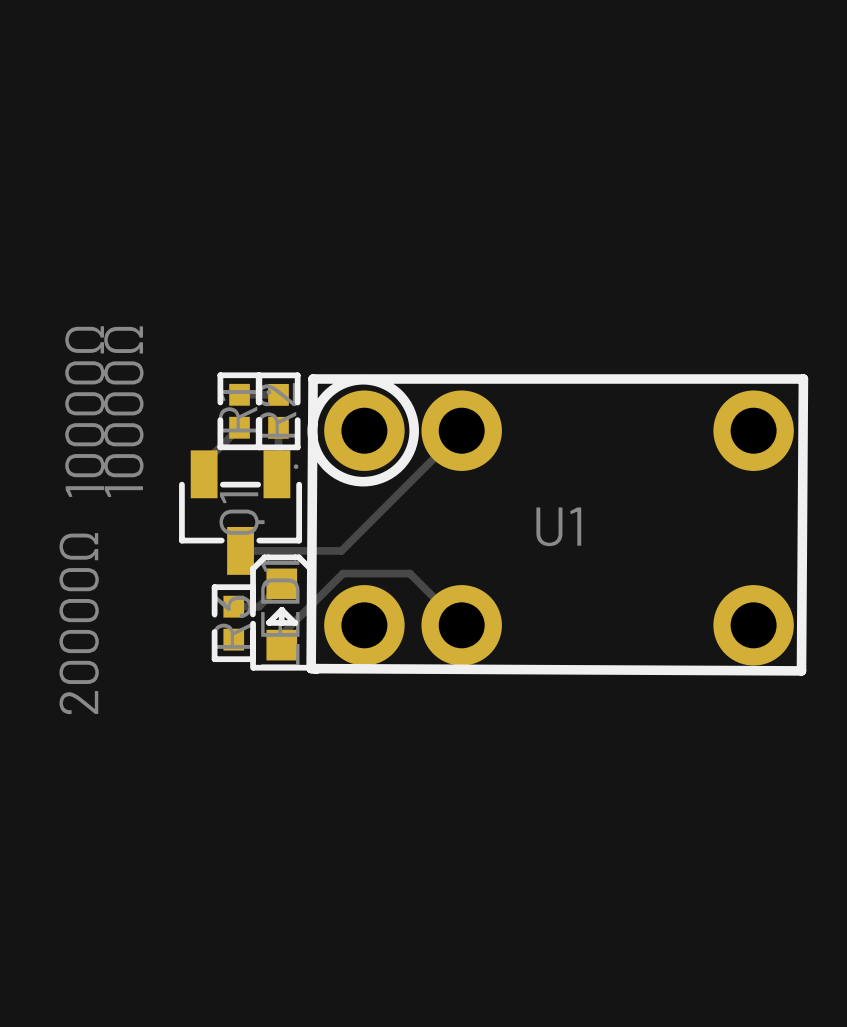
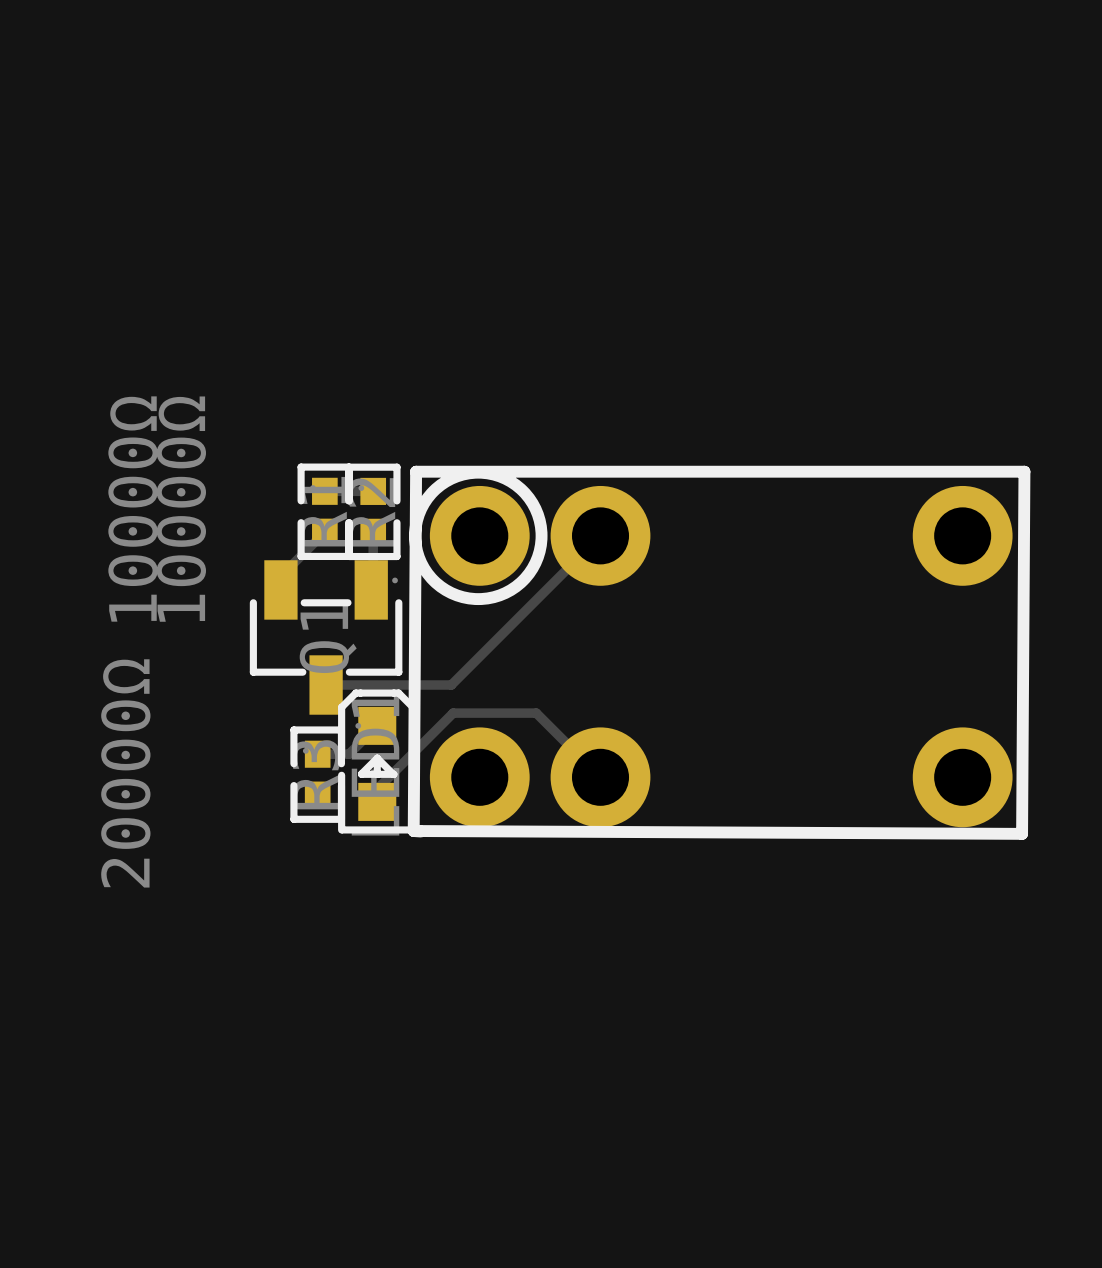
U1 name: U1 (558, 526) -> none

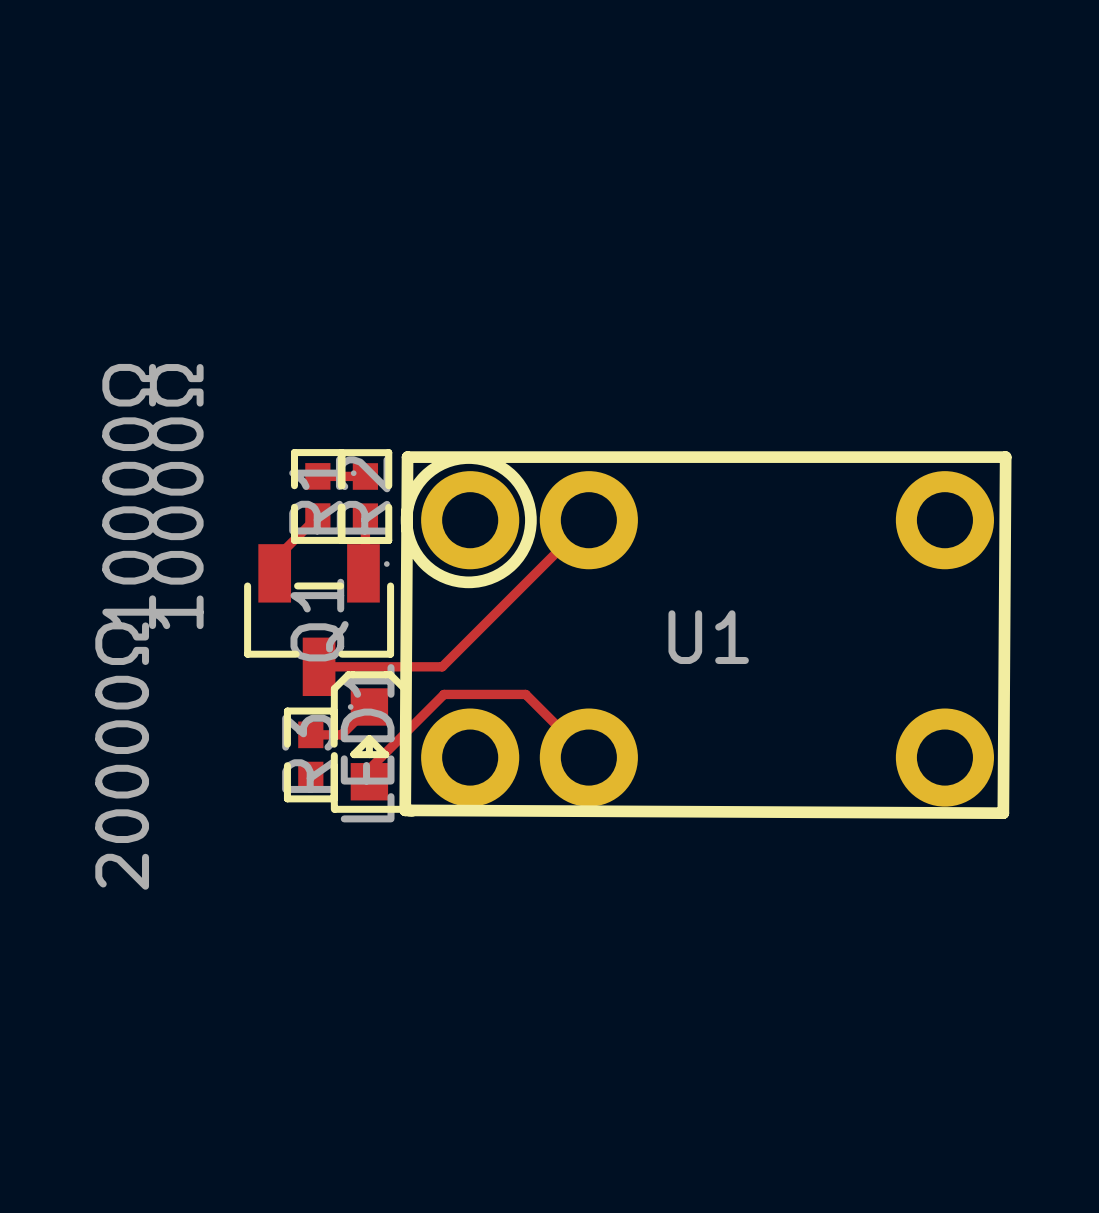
U1 name: none -> U1 (708, 637)

